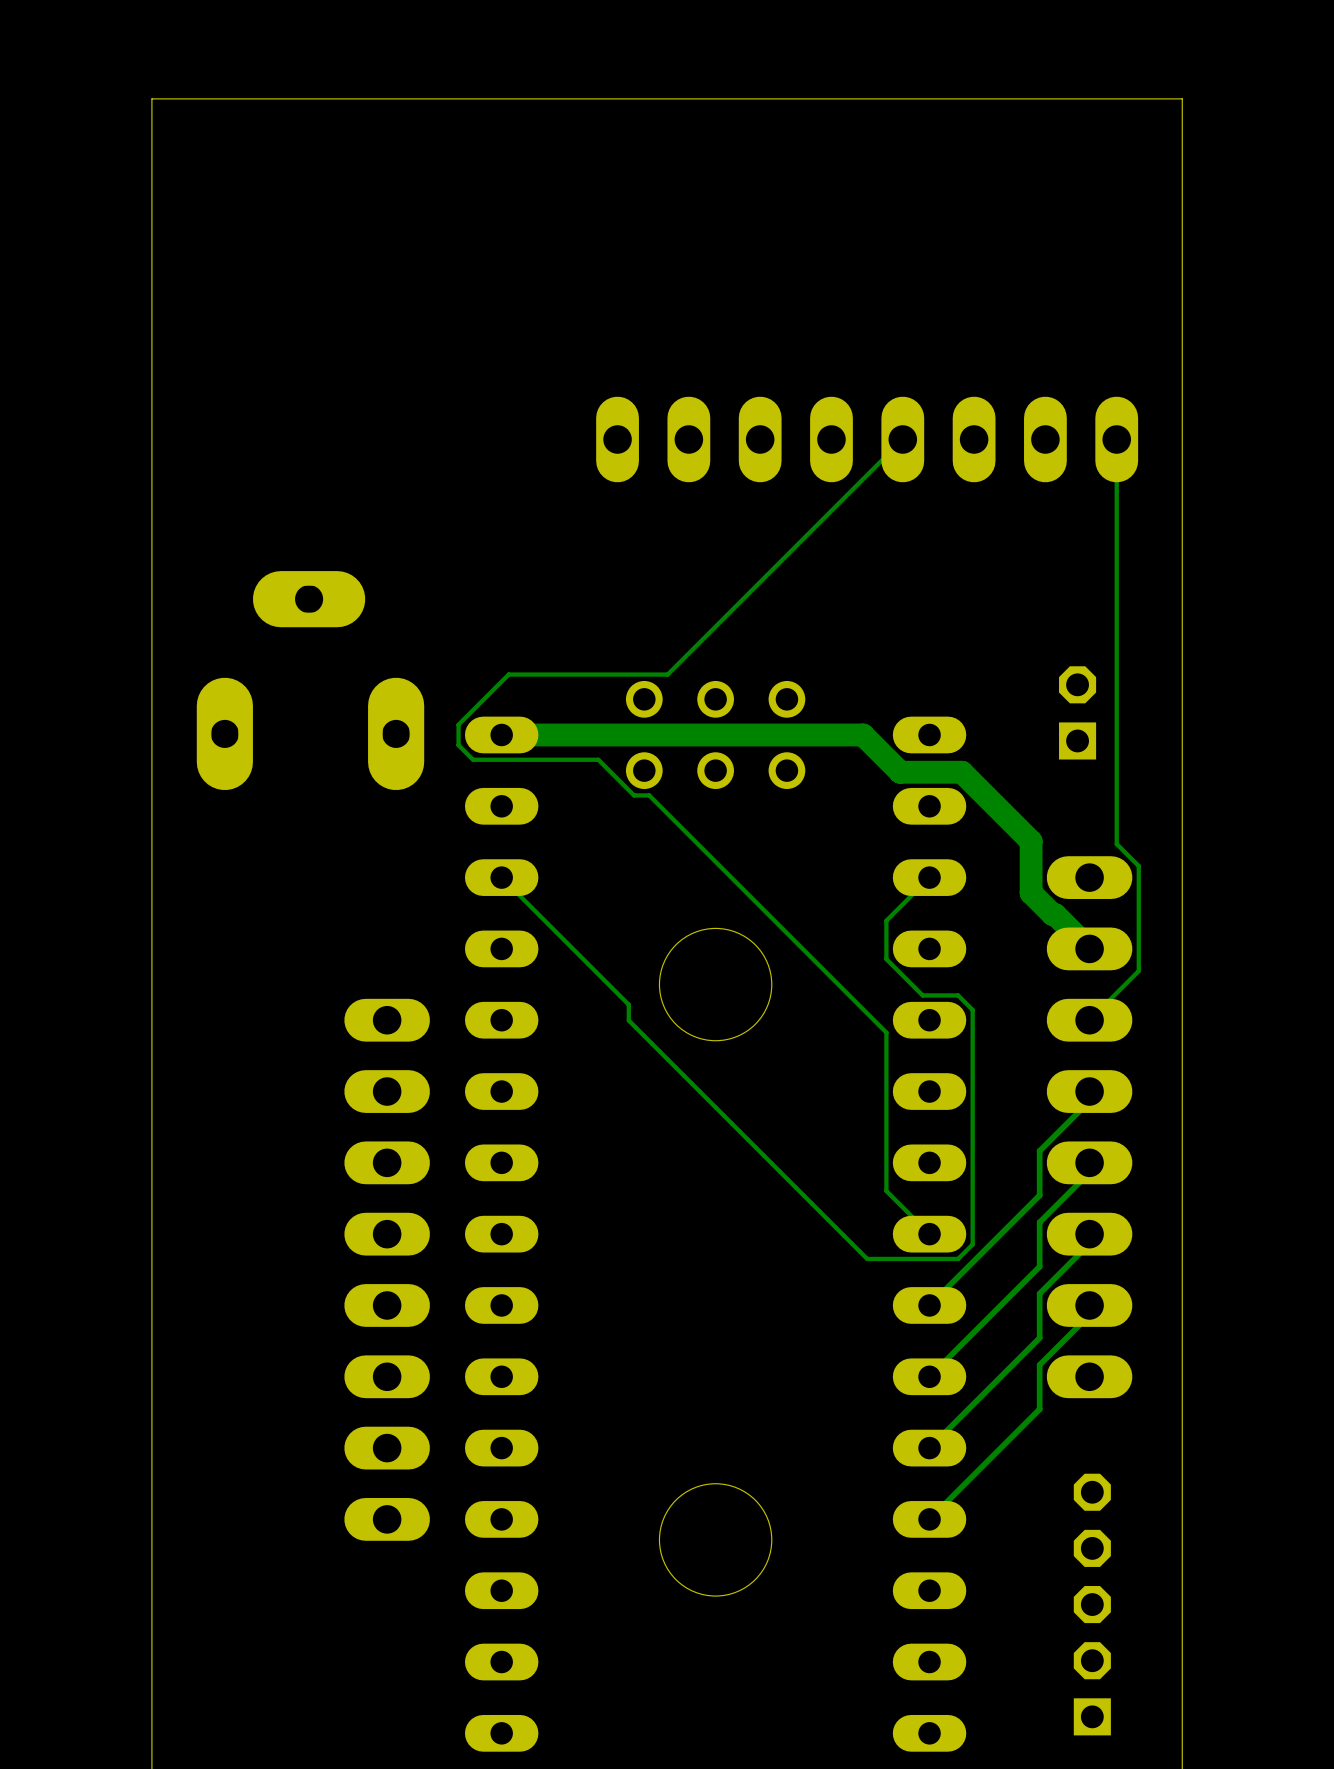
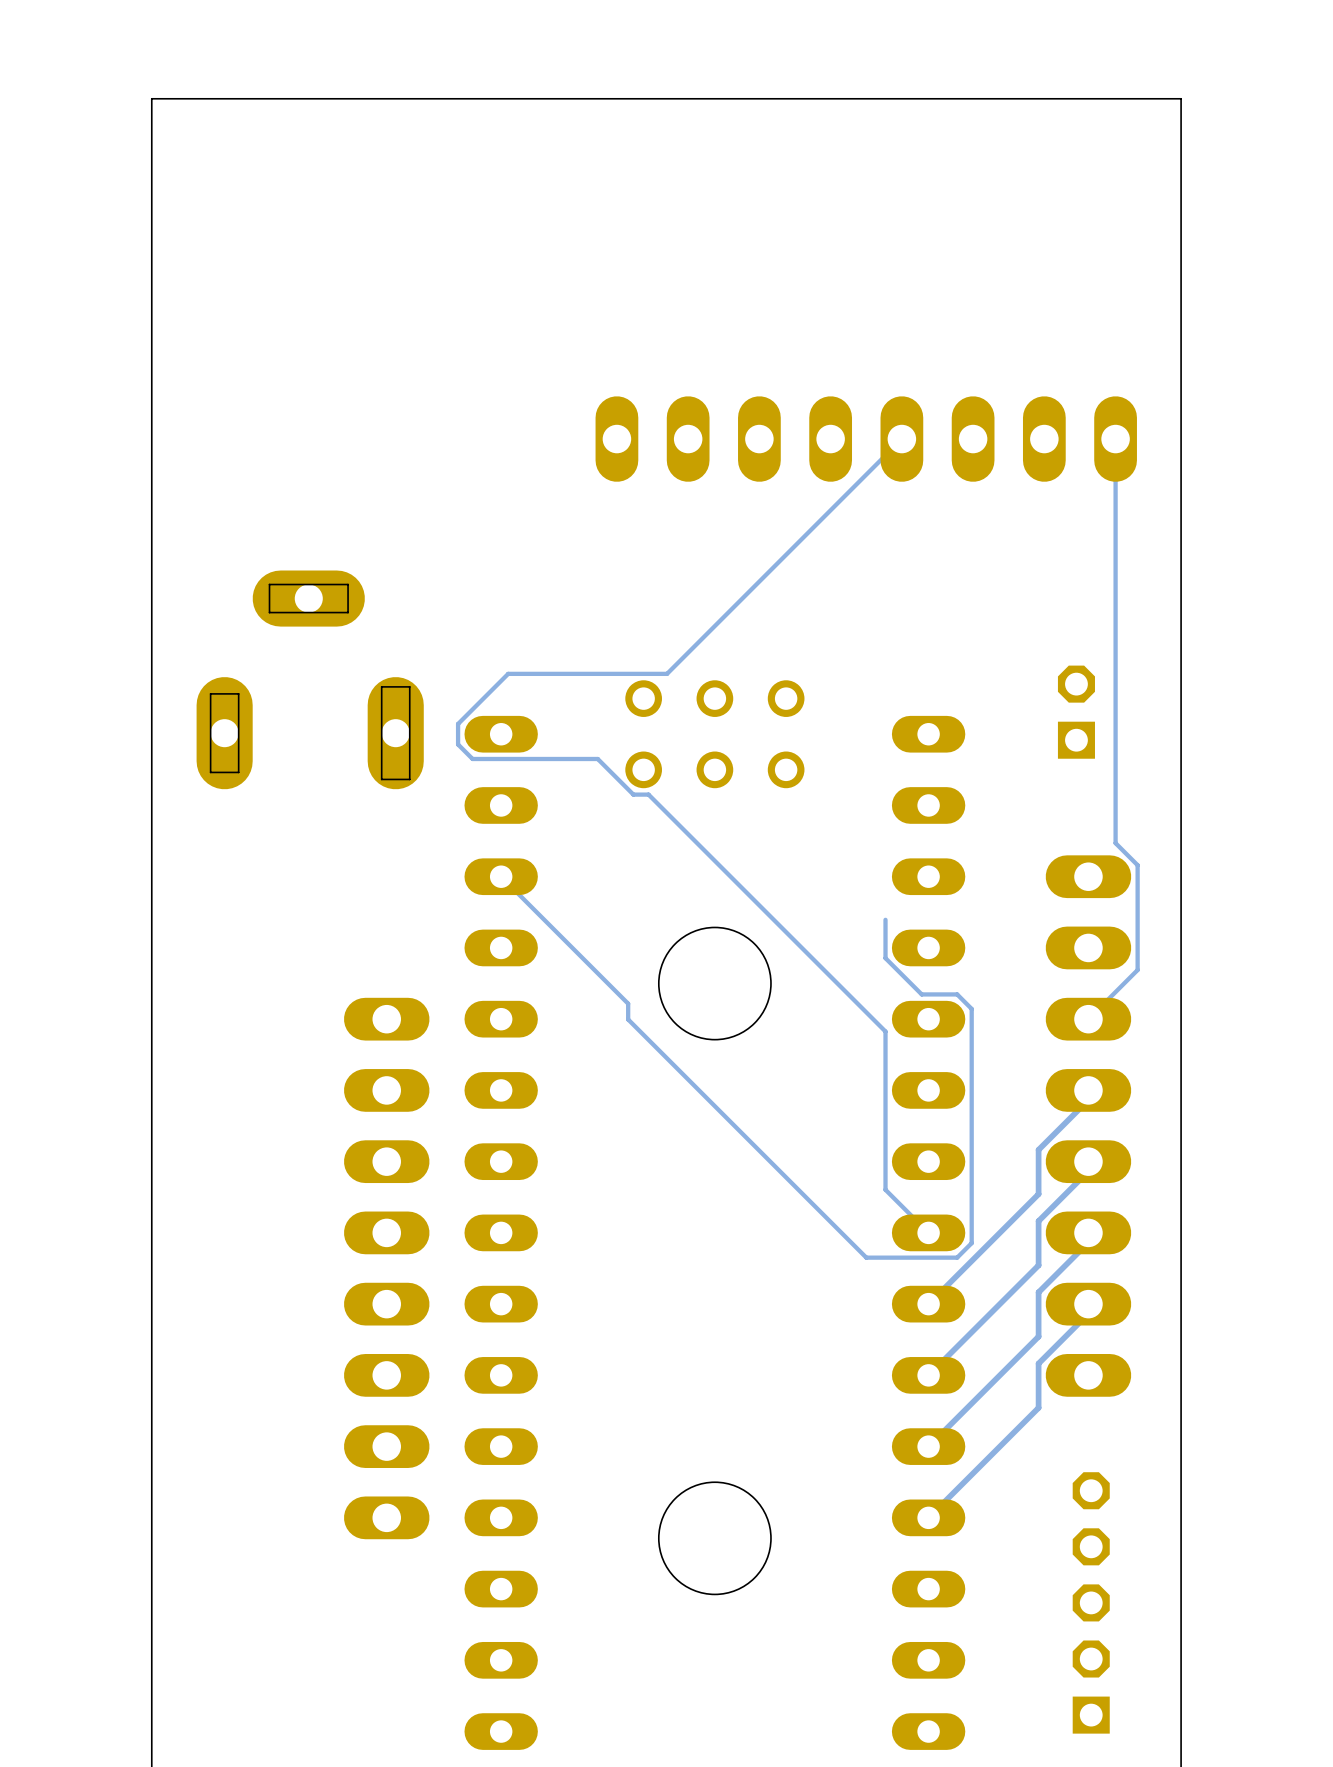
track: (501, 734) (863, 734) (900, 772) (962, 772) (1031, 841) (1031, 892) (1089, 948) -> none
track: (929, 877) (886, 920) -> none

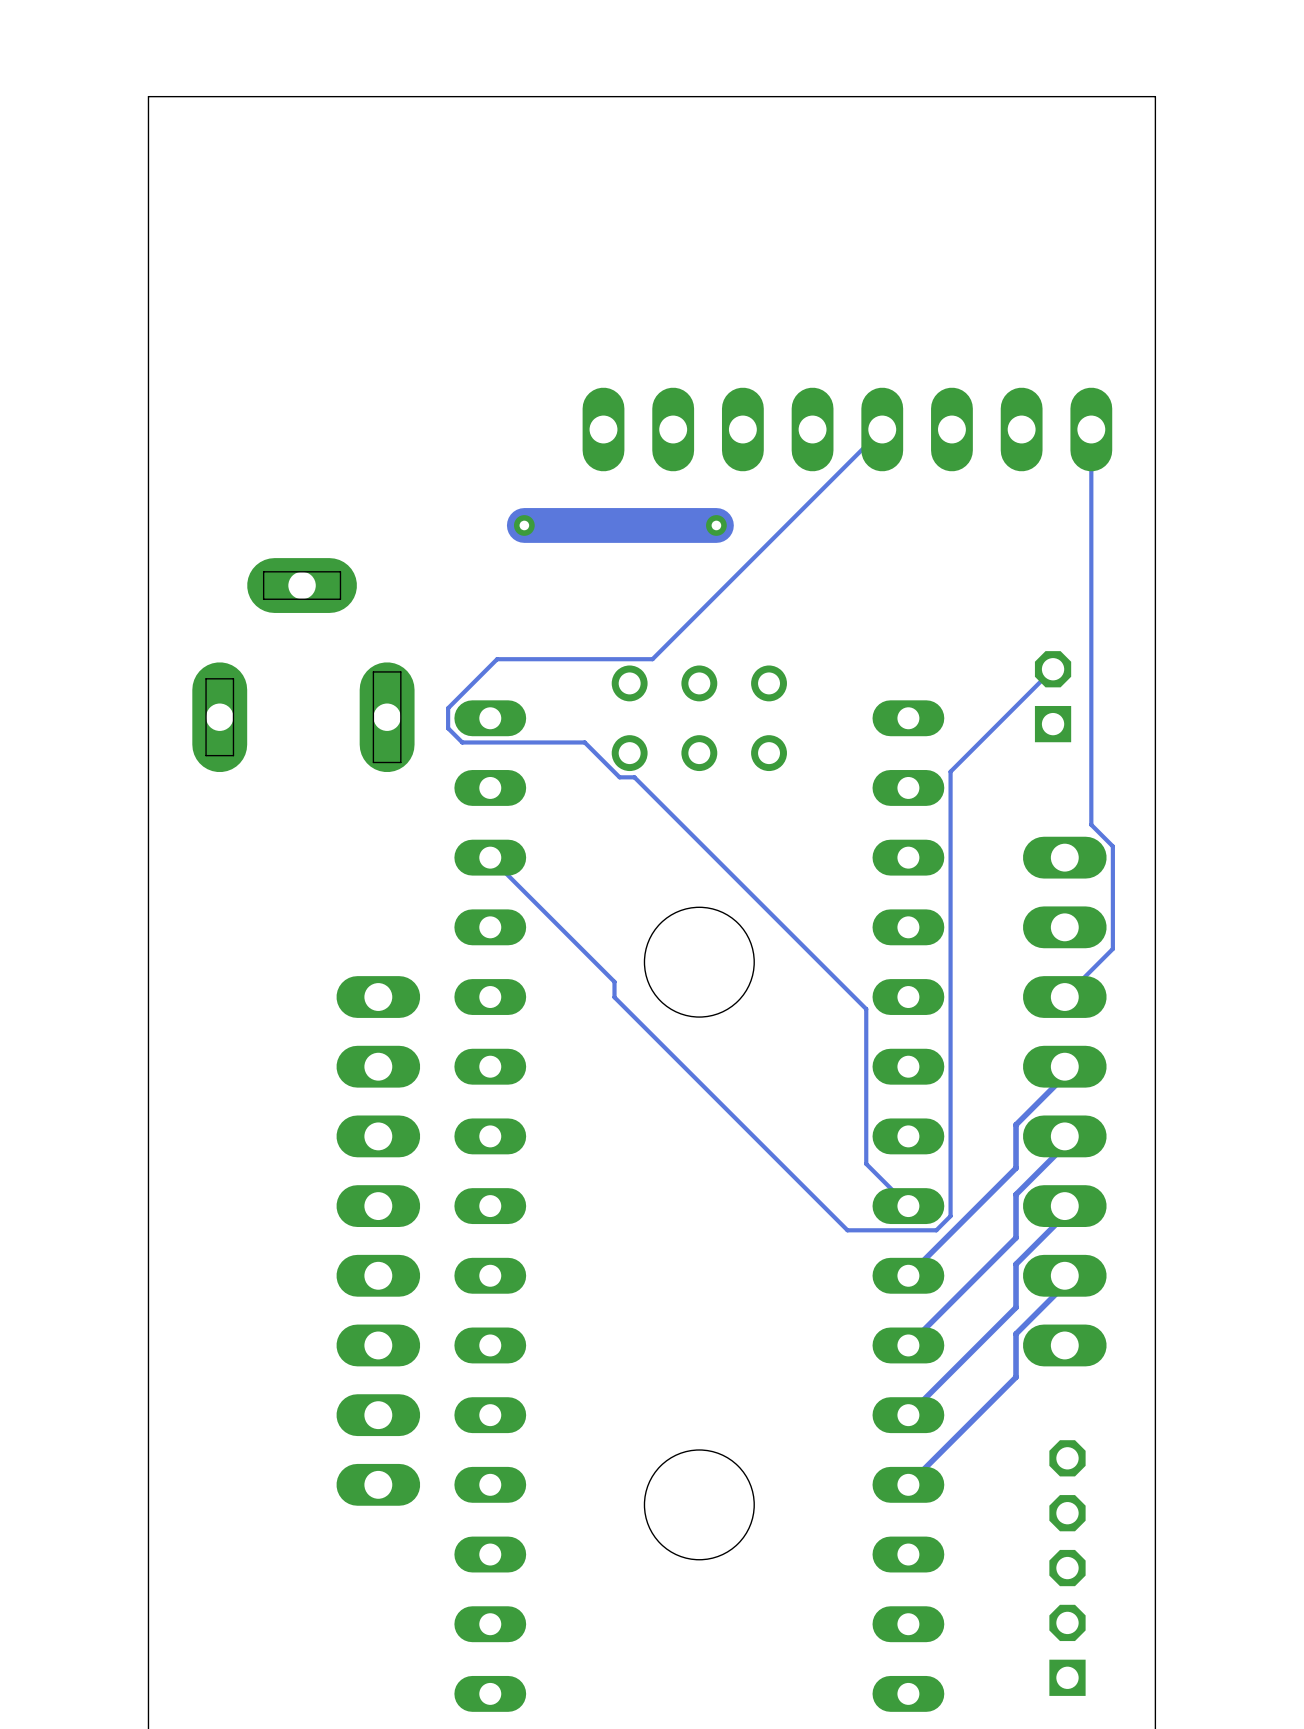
via: none -> (524, 525)
track: none -> (716, 525) (524, 525)
via: none -> (716, 525)
track: (885, 919) (885, 958) (921, 994) (957, 994) (971, 1008) -> (1053, 669) (950, 771) (950, 986)

